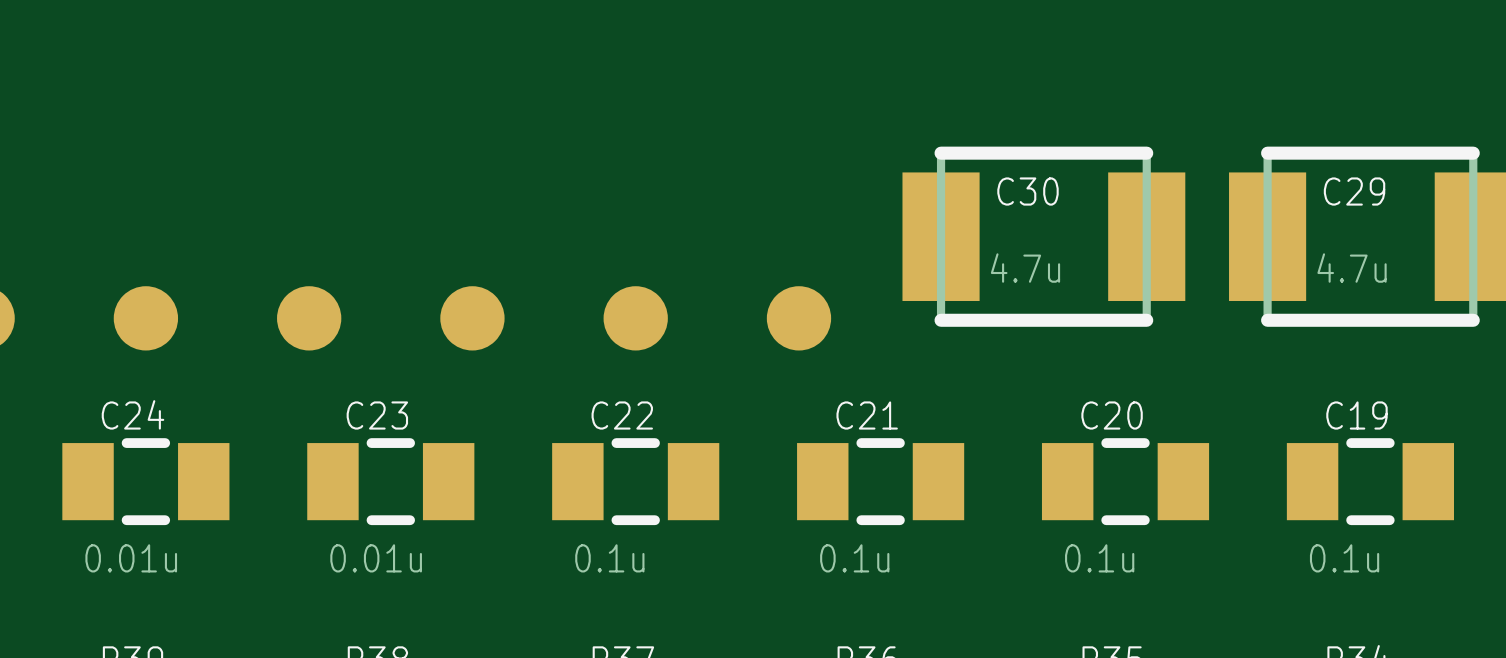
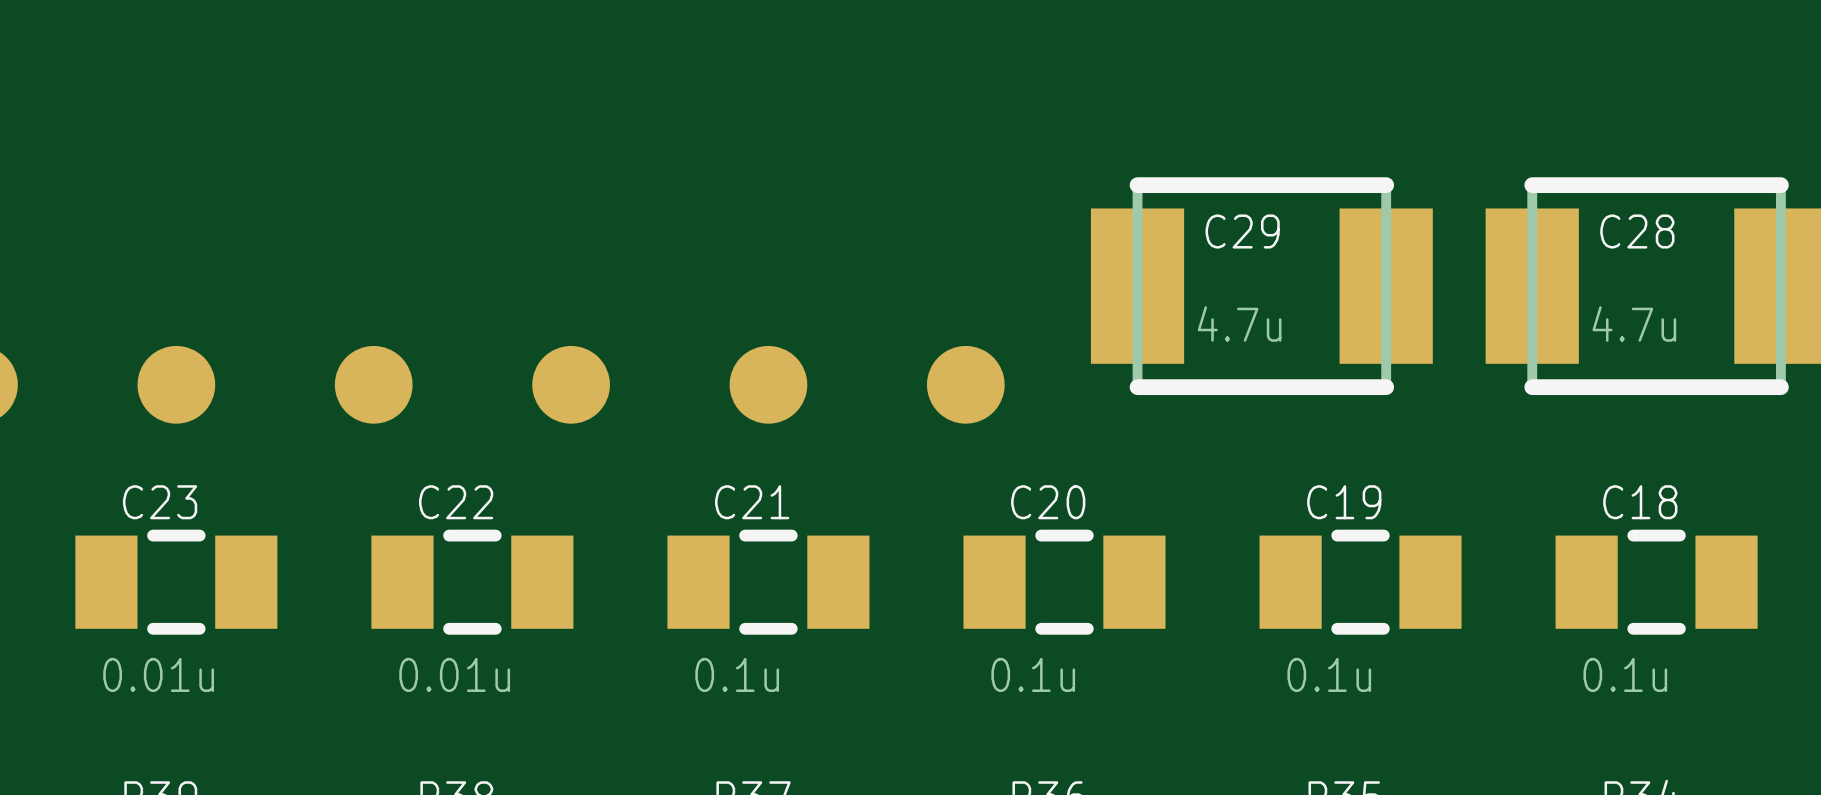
C30 name: C30 (1027, 191) -> C29 (1242, 231)
C29 name: C29 (1354, 191) -> C28 (1637, 231)
C24 name: C24 (132, 414) -> C23 (160, 502)
C23 name: C23 (377, 415) -> C22 (456, 502)
C22 name: C22 (622, 415) -> C21 (752, 502)
C21 name: C21 (867, 415) -> C20 (1048, 502)
C20 name: C20 (1112, 415) -> C19 (1344, 502)
C19 name: C19 (1356, 415) -> C18 (1640, 502)

